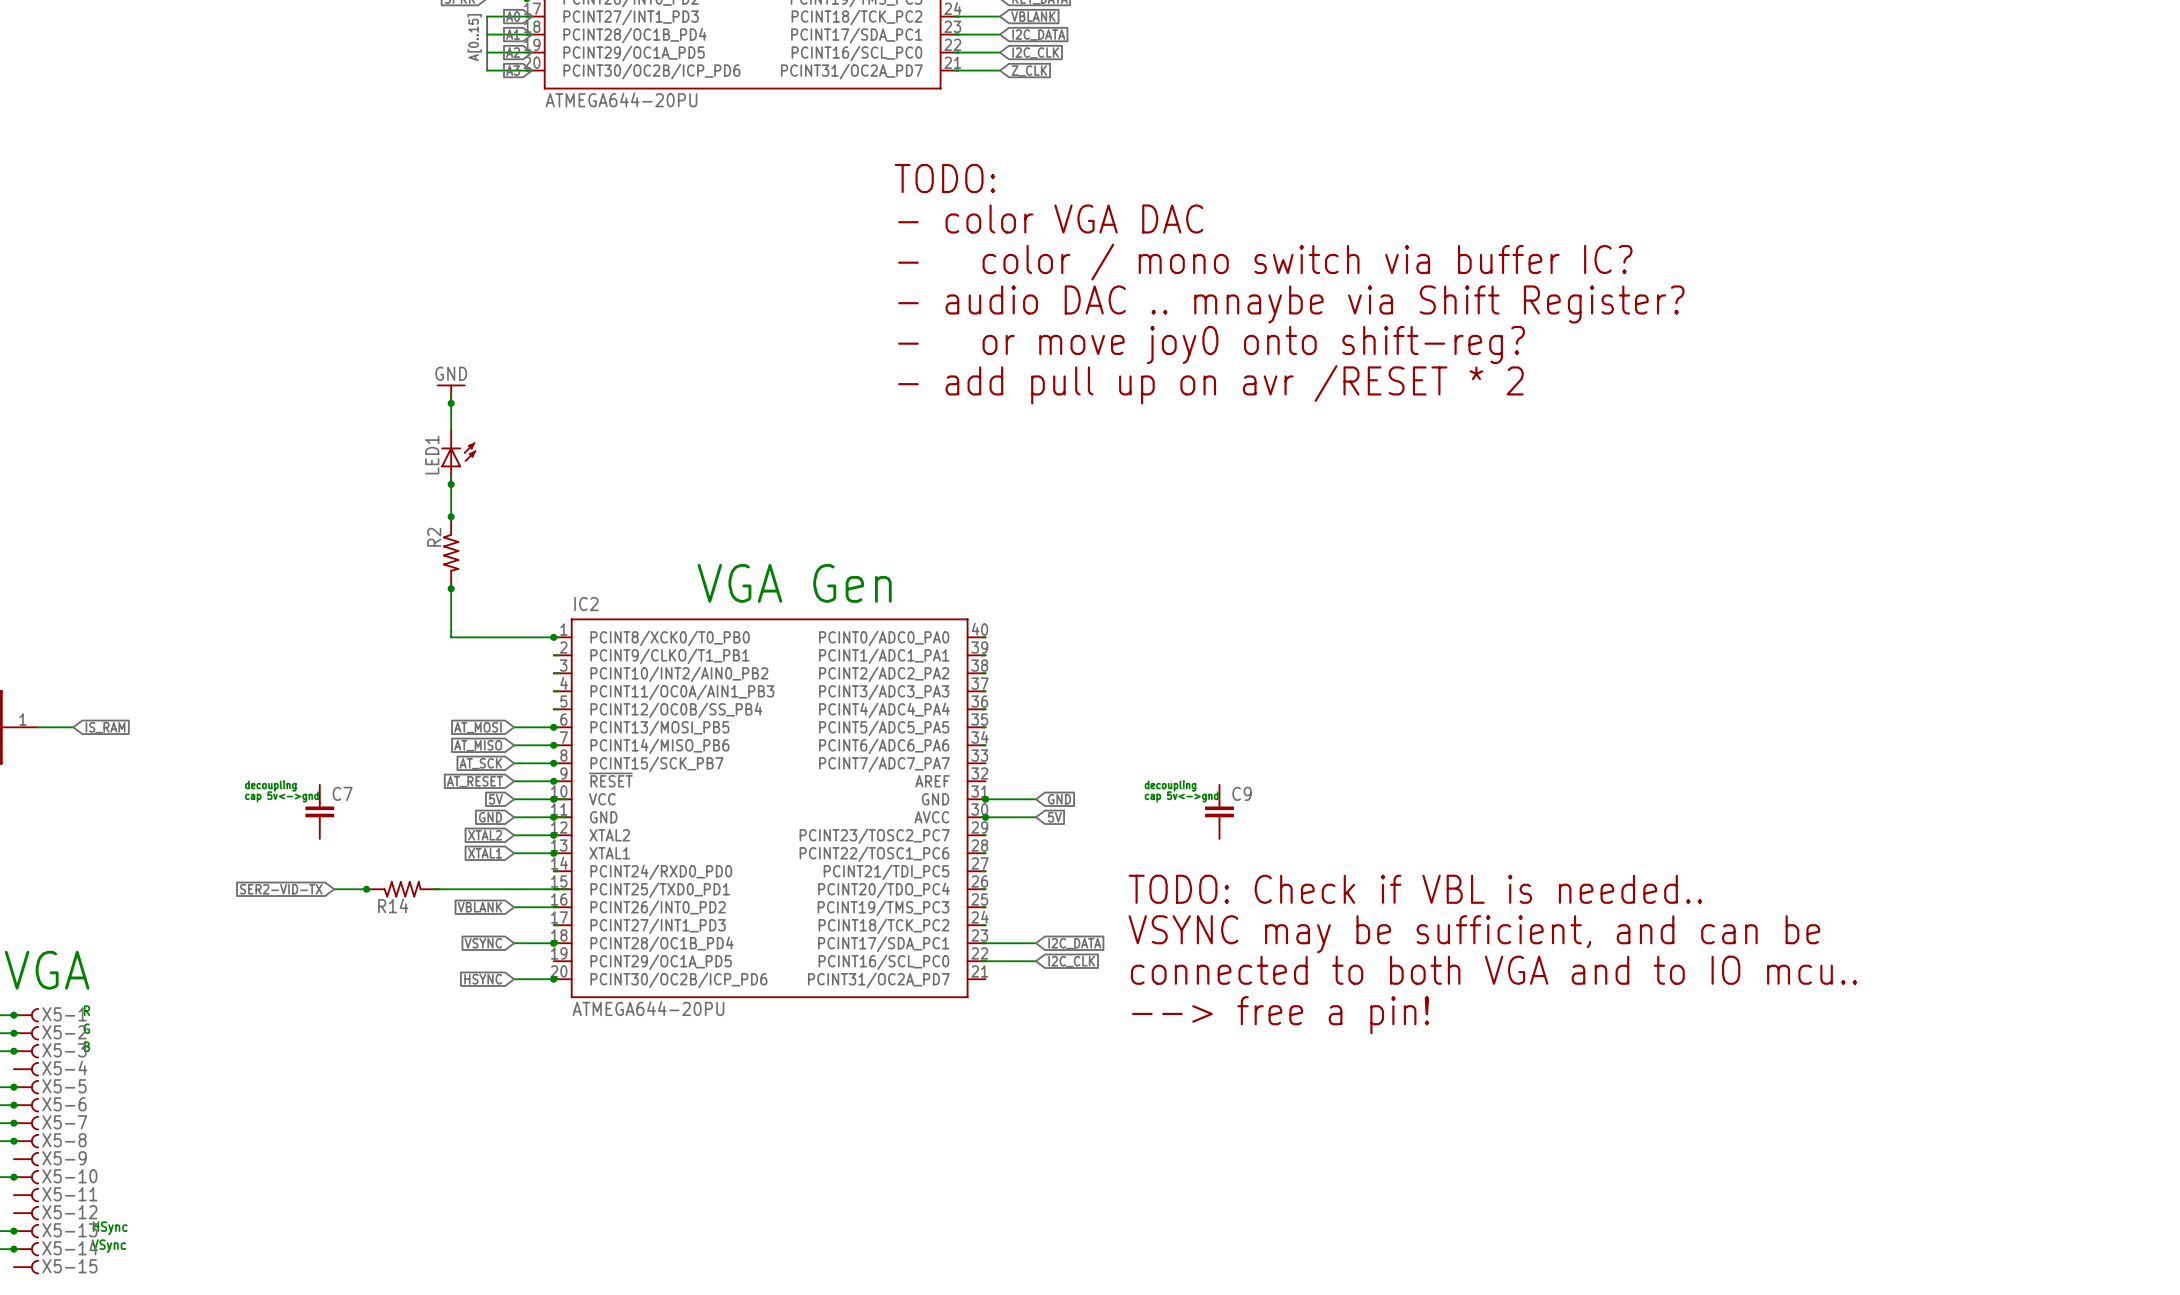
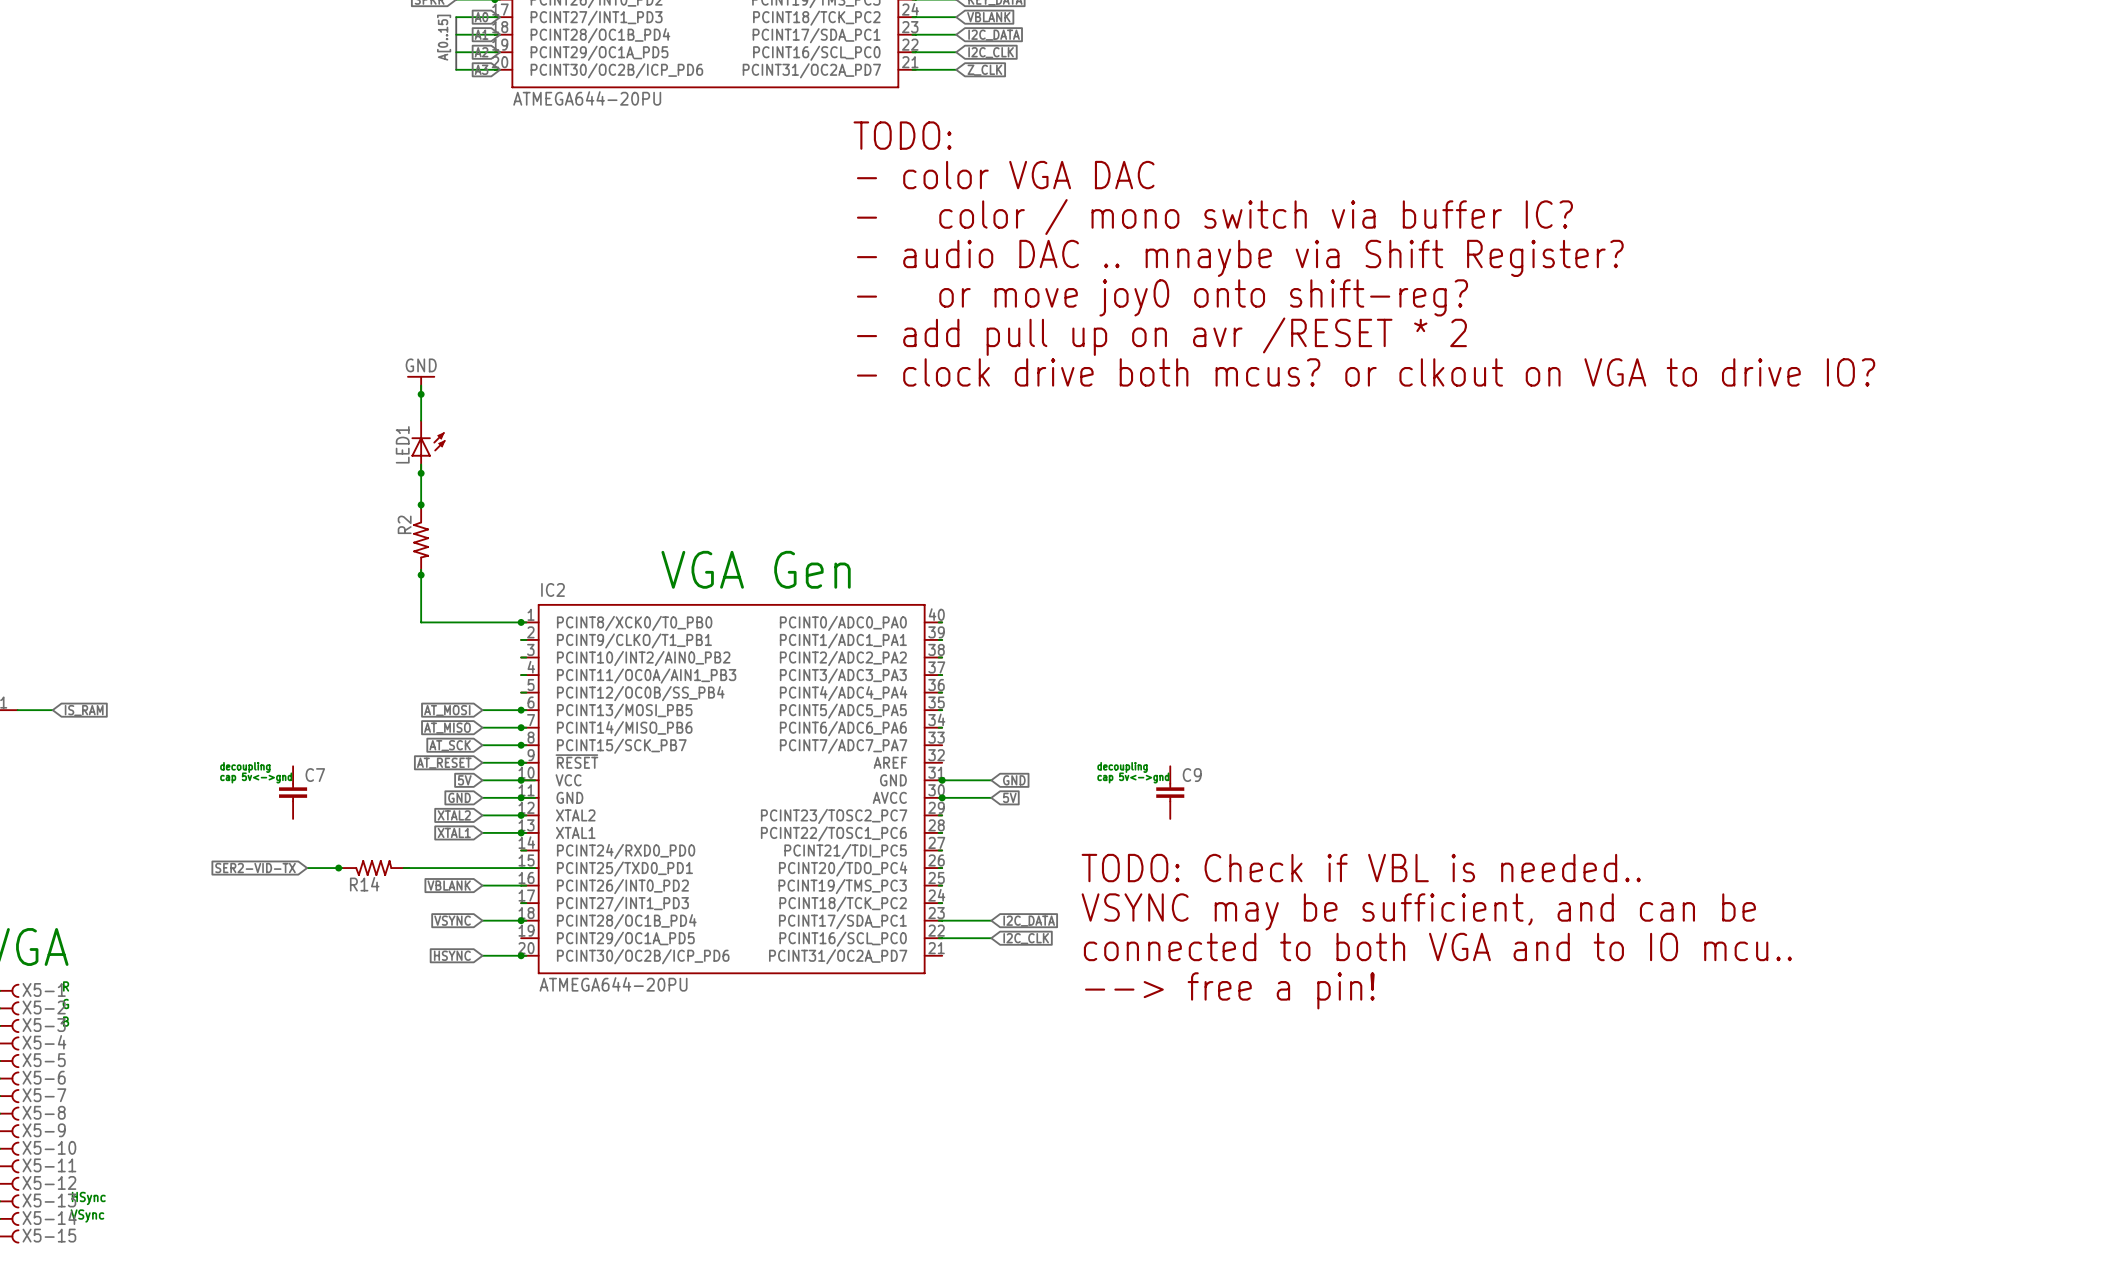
text: none -> TODO: (902, 135)
text: TODO: (944, 178) -> - color VGA DAC (1005, 175)
text: - color VGA DAC (1050, 219) -> - color / mono switch via buffer IC? (1214, 217)
text: - color / mono switch via buffer IC? (1265, 262) -> - audio DAC .. mnaybe via Shift Register? (1240, 258)
text: - audio DAC .. mnaybe via Shift Register? (1291, 304) -> - or move joy0 onto shift-reg? (1162, 297)
text: - or move joy0 onto shift-reg? (1211, 344) -> - add pull up on avr /RESET * 2 (1161, 336)
text: - add pull up on avr /RESET * 2 (1210, 384) -> - clock drive both mcus? or clkout on VGA to drive IO? (1366, 372)

